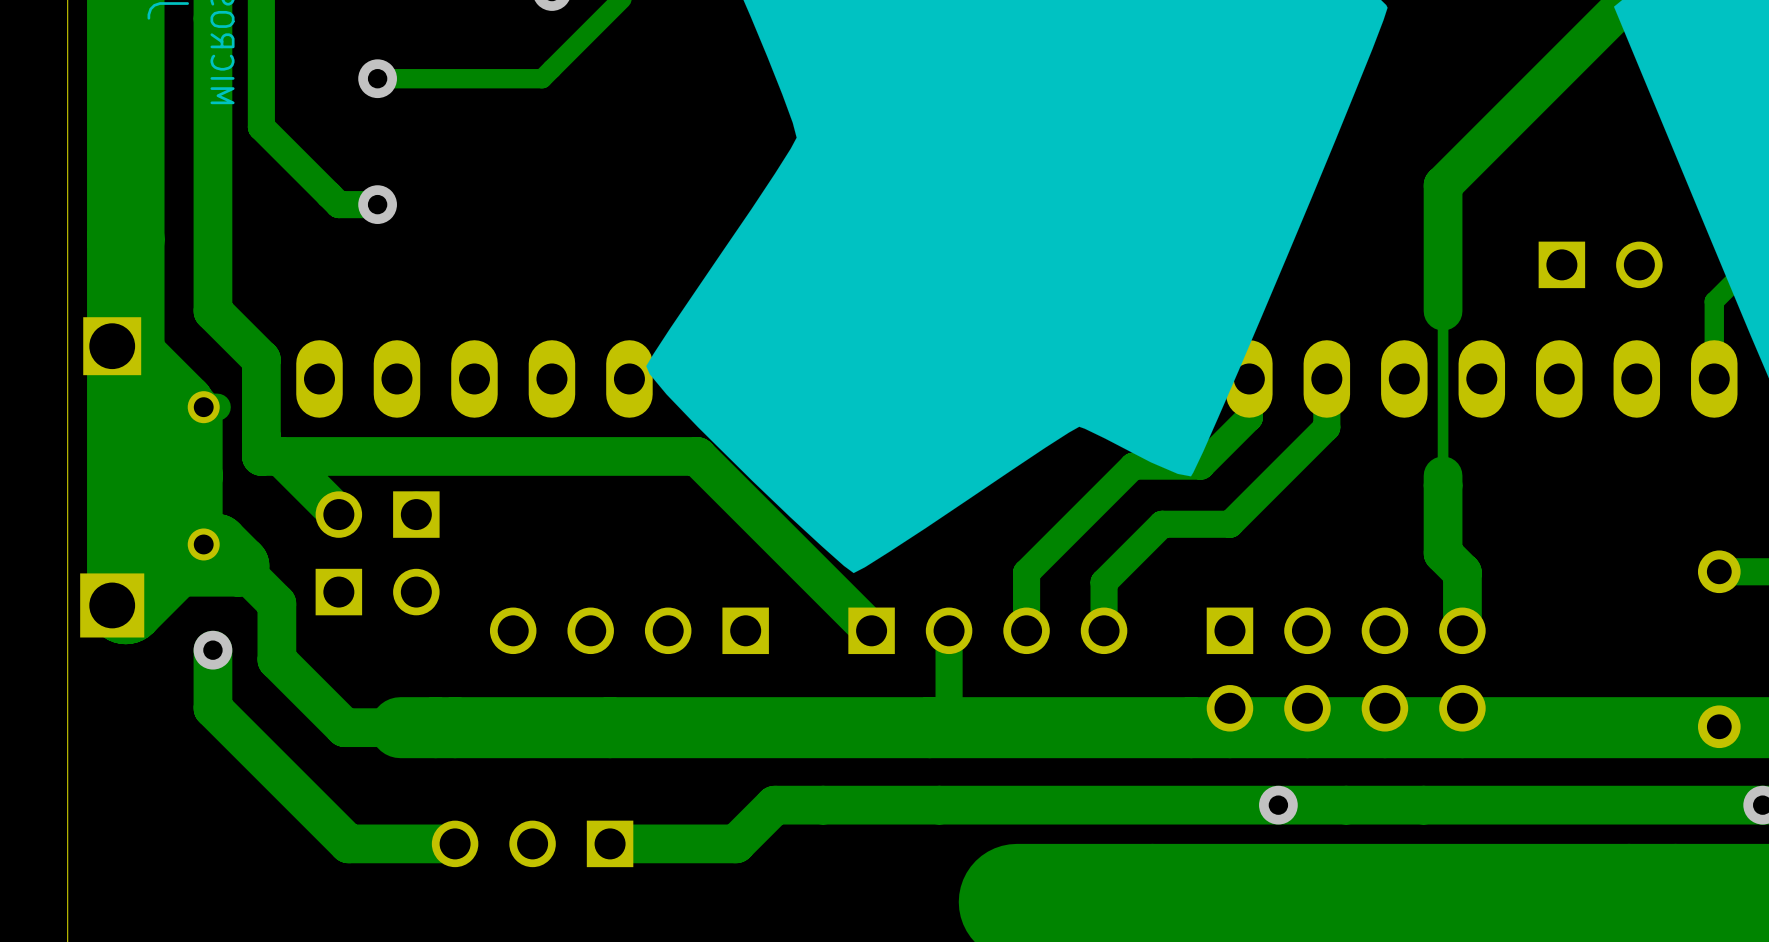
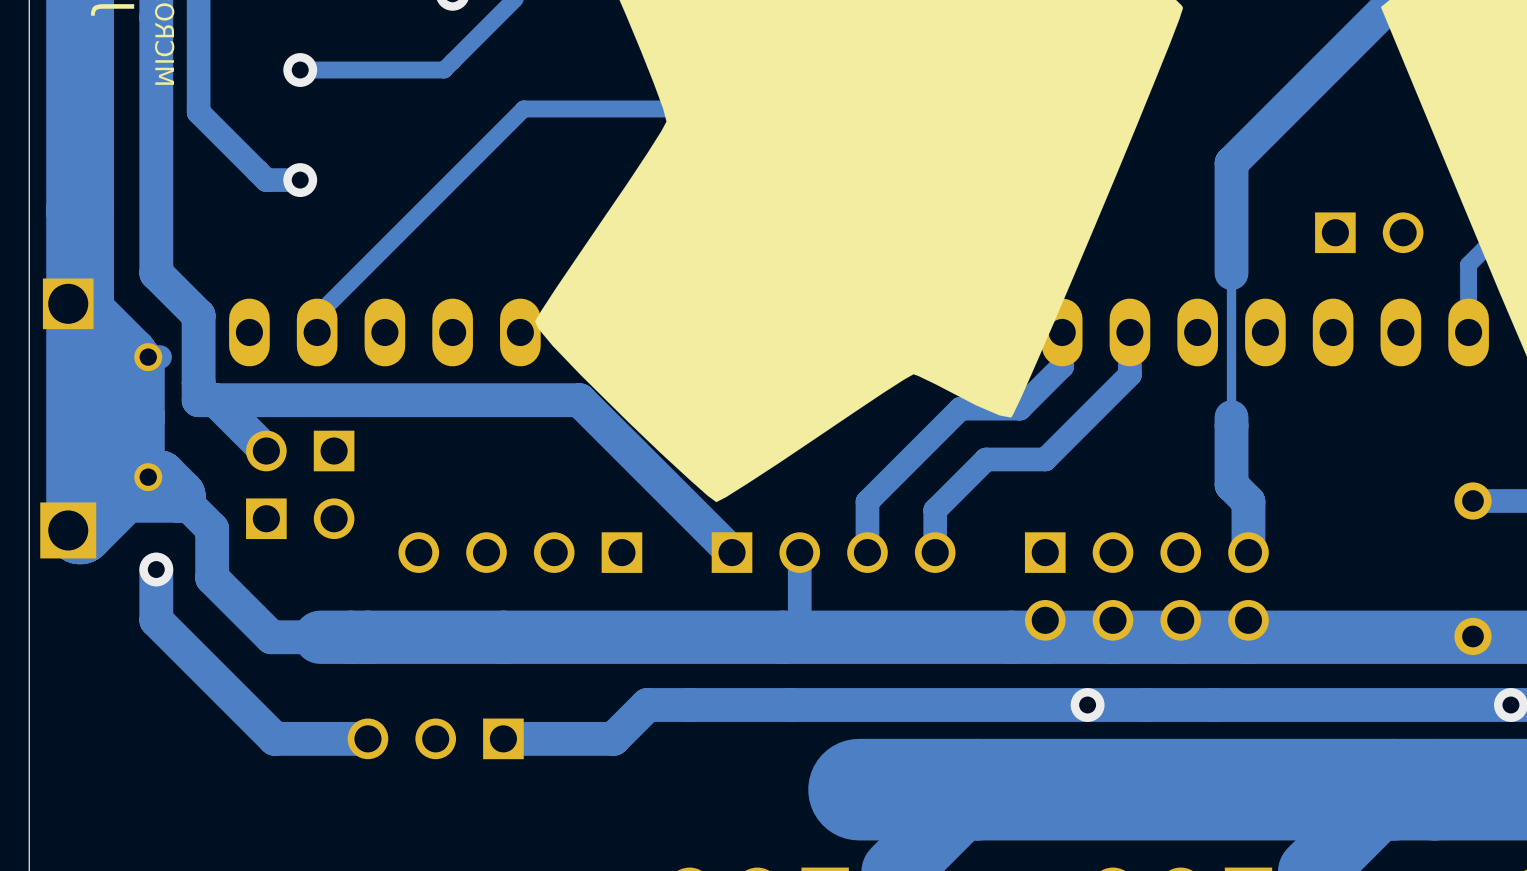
track: none -> (1052, 108) (523, 108) (317, 315) (317, 332)

